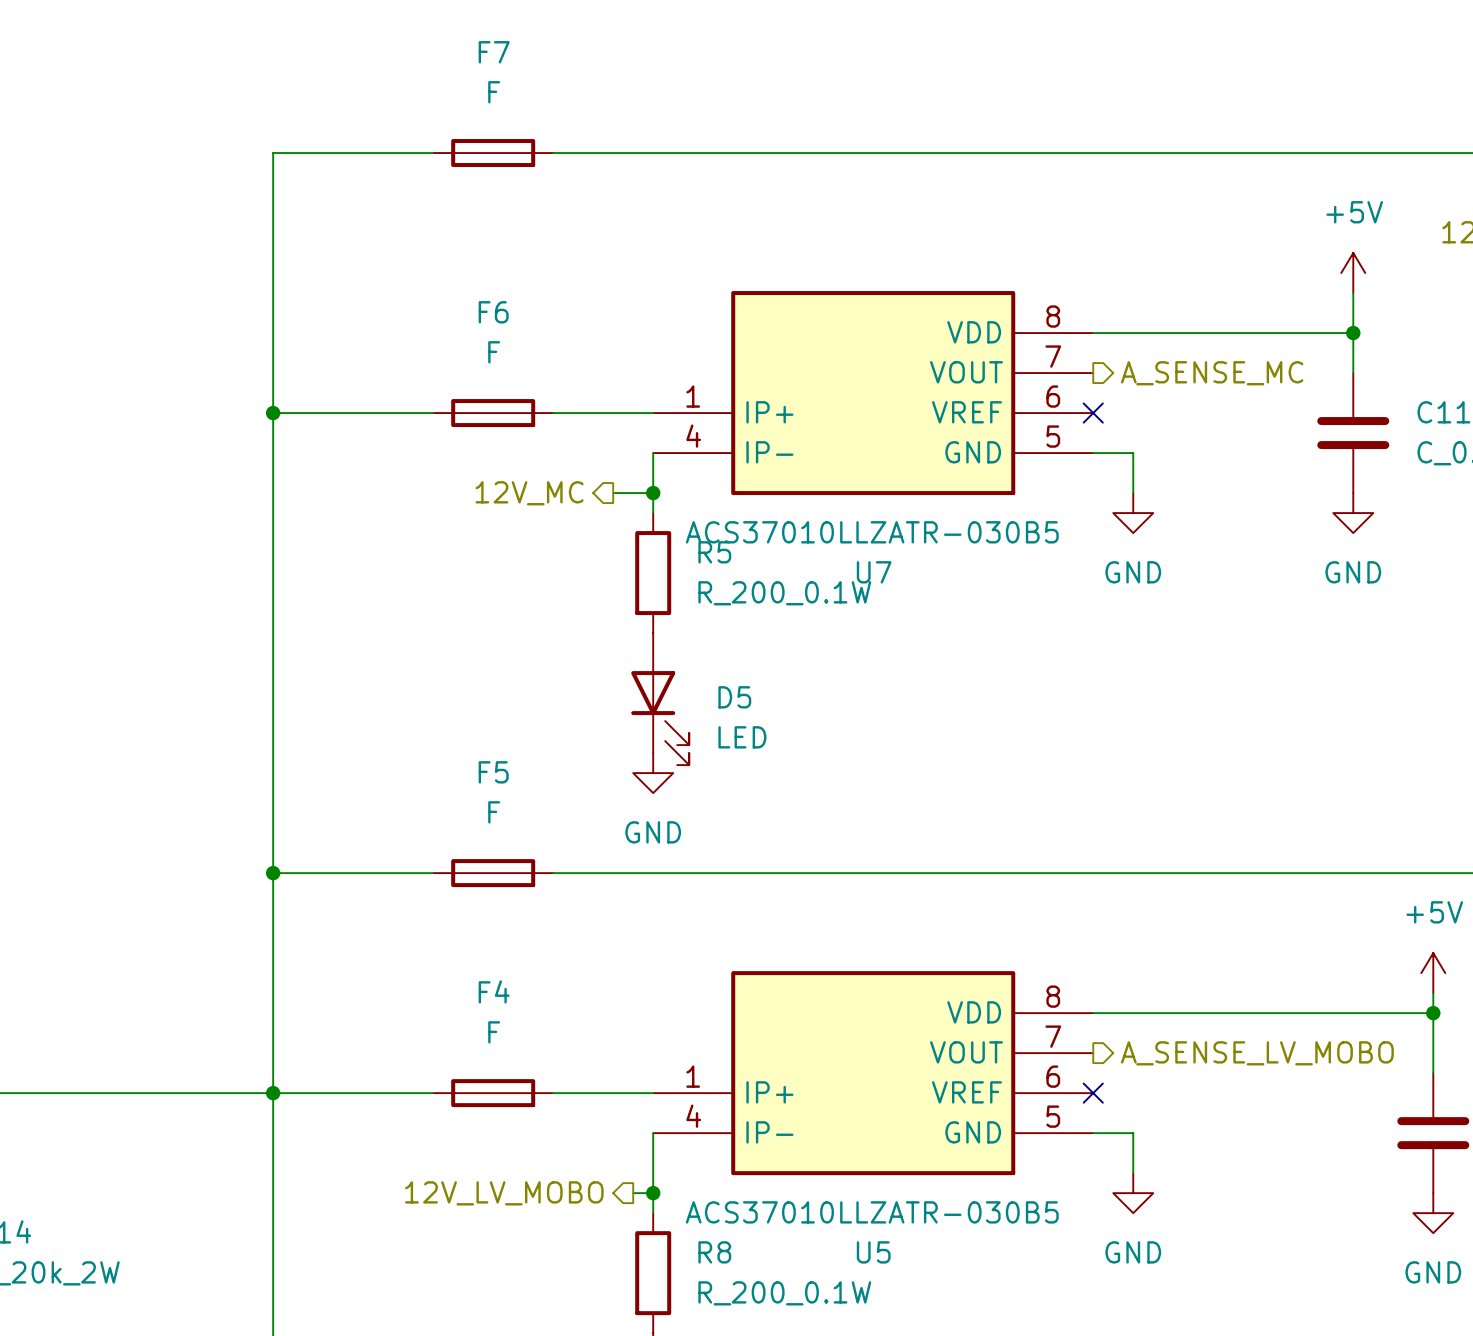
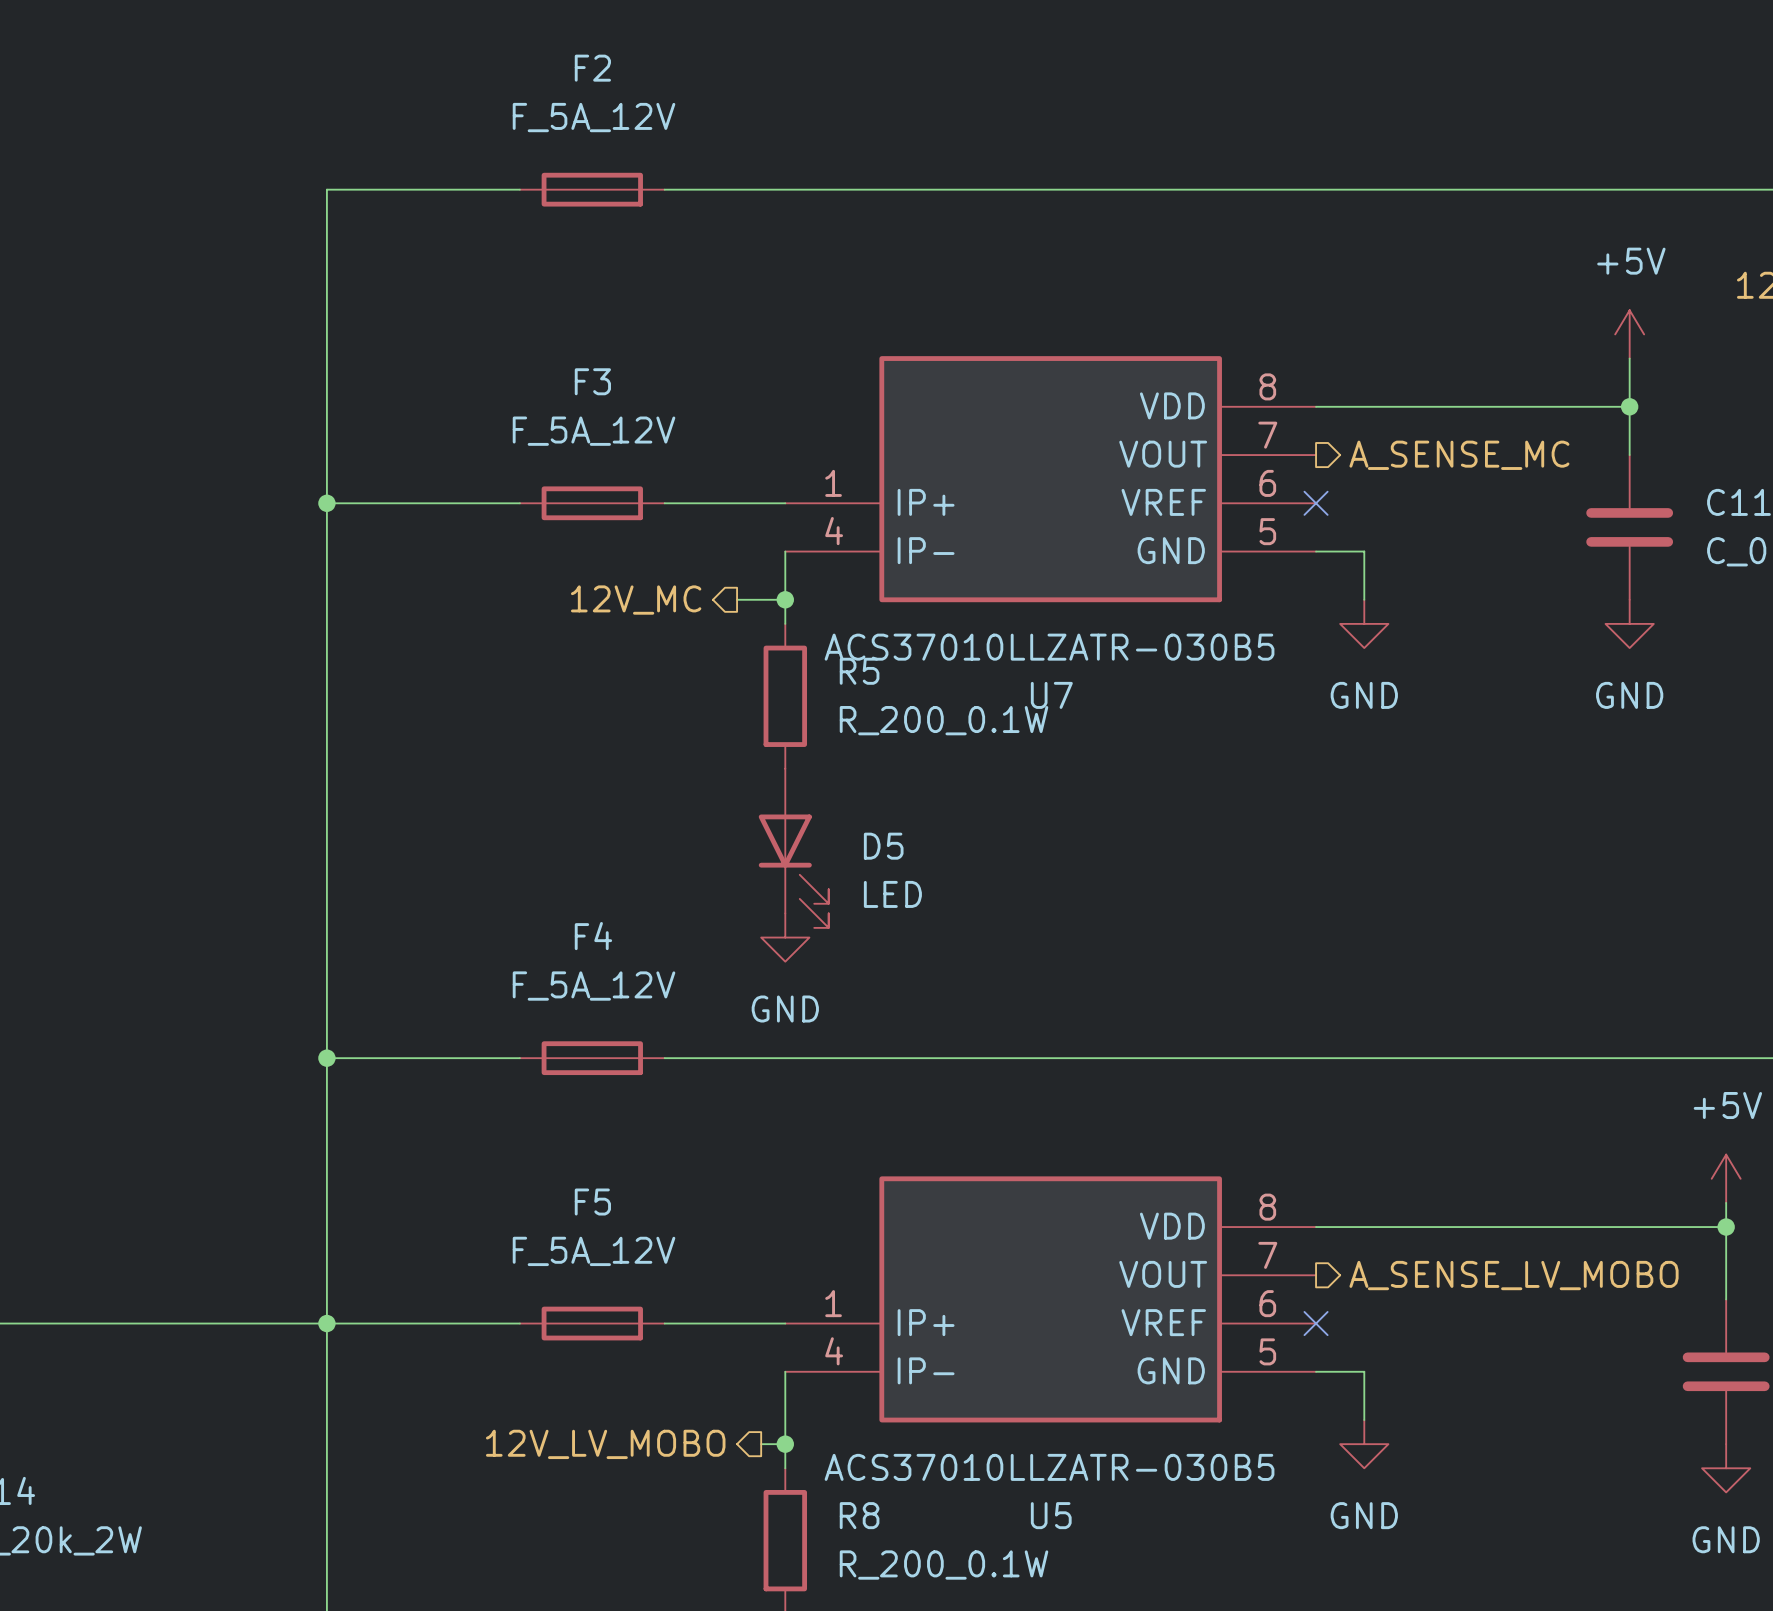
F7 name: F7 (494, 52) -> F2 (592, 68)
F7 value: F (494, 92) -> F_5A_12V (594, 117)
F6 name: F6 (493, 312) -> F3 (592, 381)
F6 value: F (494, 352) -> F_5A_12V (594, 431)
F5 name: F5 (493, 772) -> F4 (593, 936)
F5 value: F (494, 812) -> F_5A_12V (594, 986)
F4 name: F4 (494, 991) -> F5 (592, 1202)
F4 value: F (494, 1032) -> F_5A_12V (594, 1251)

